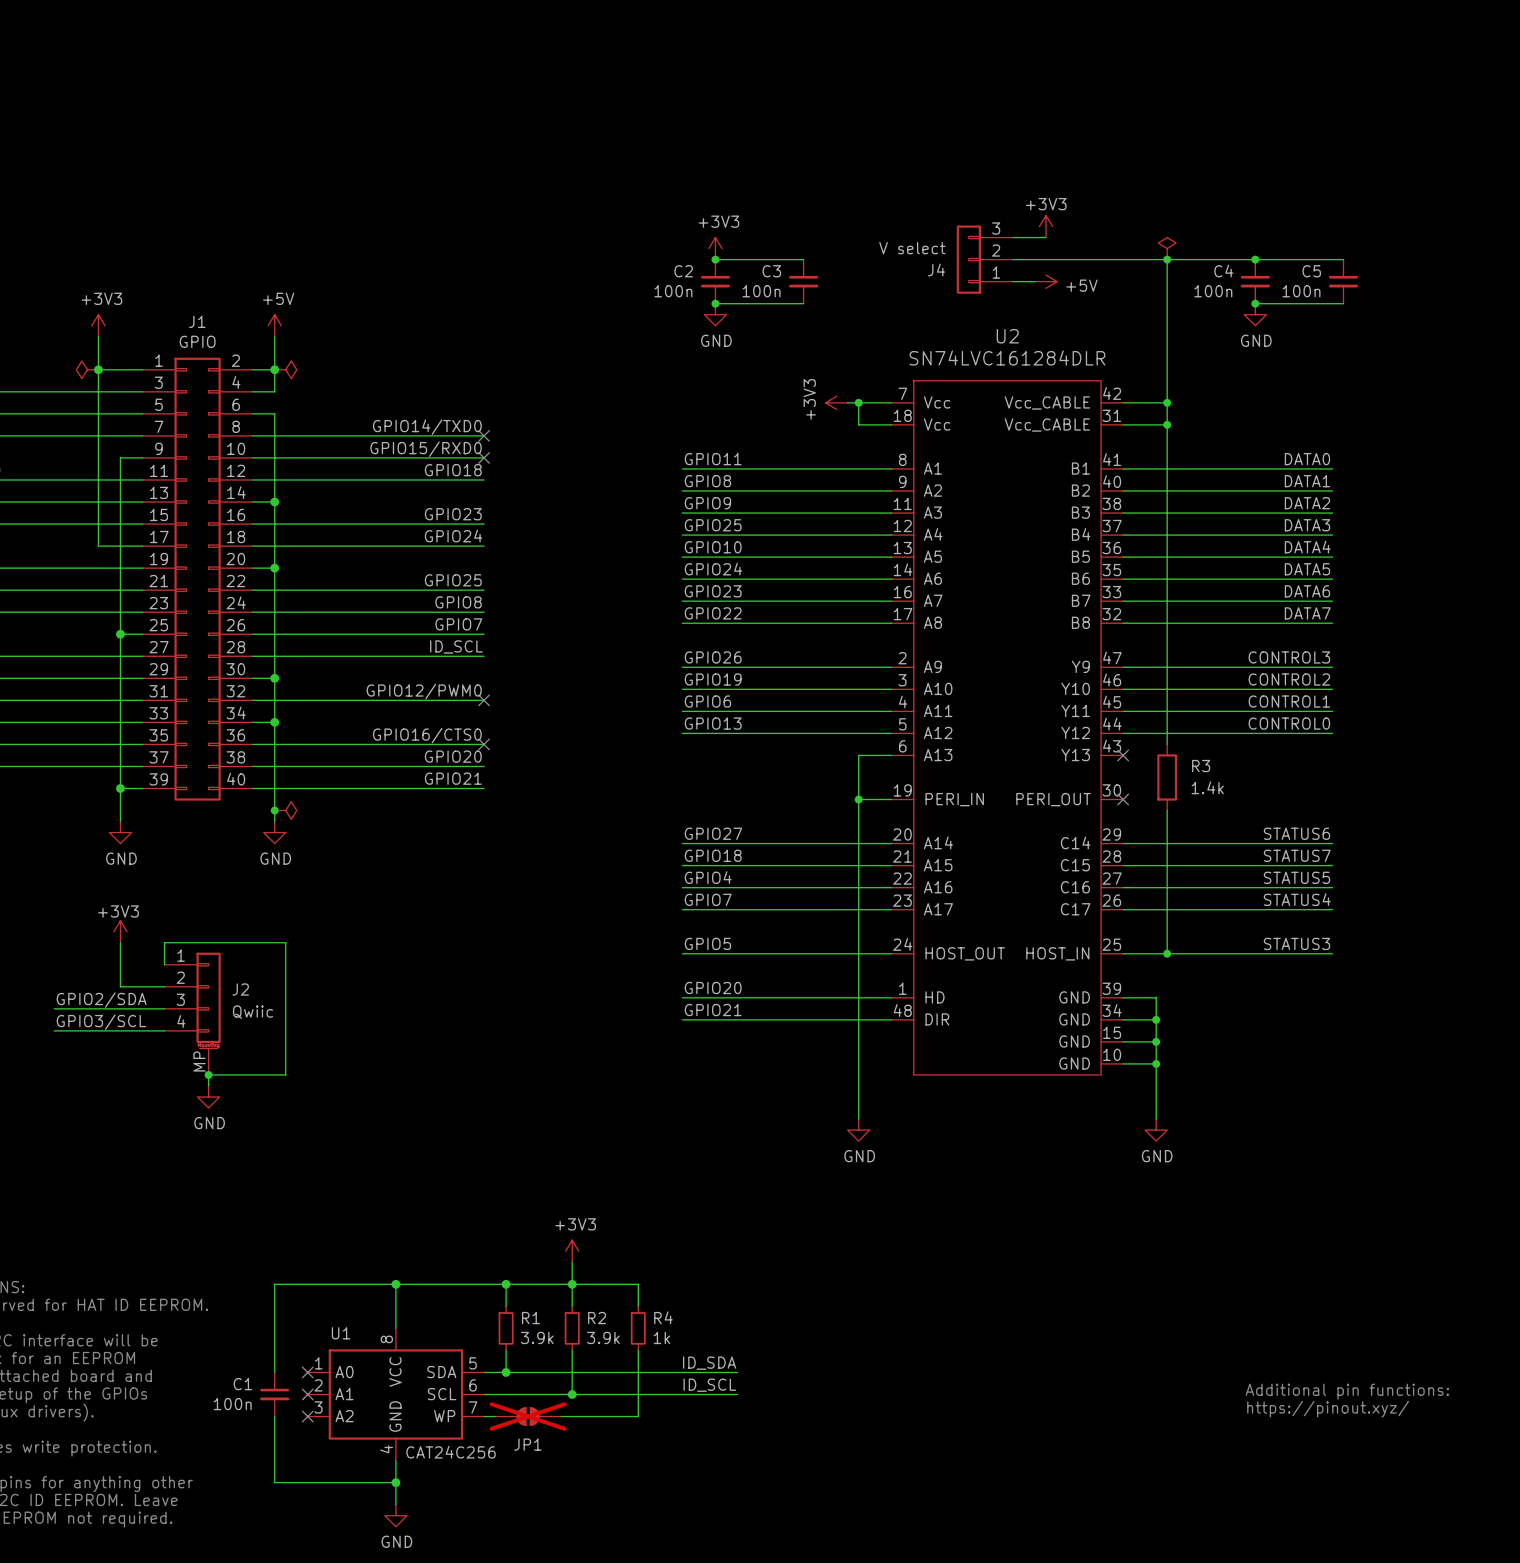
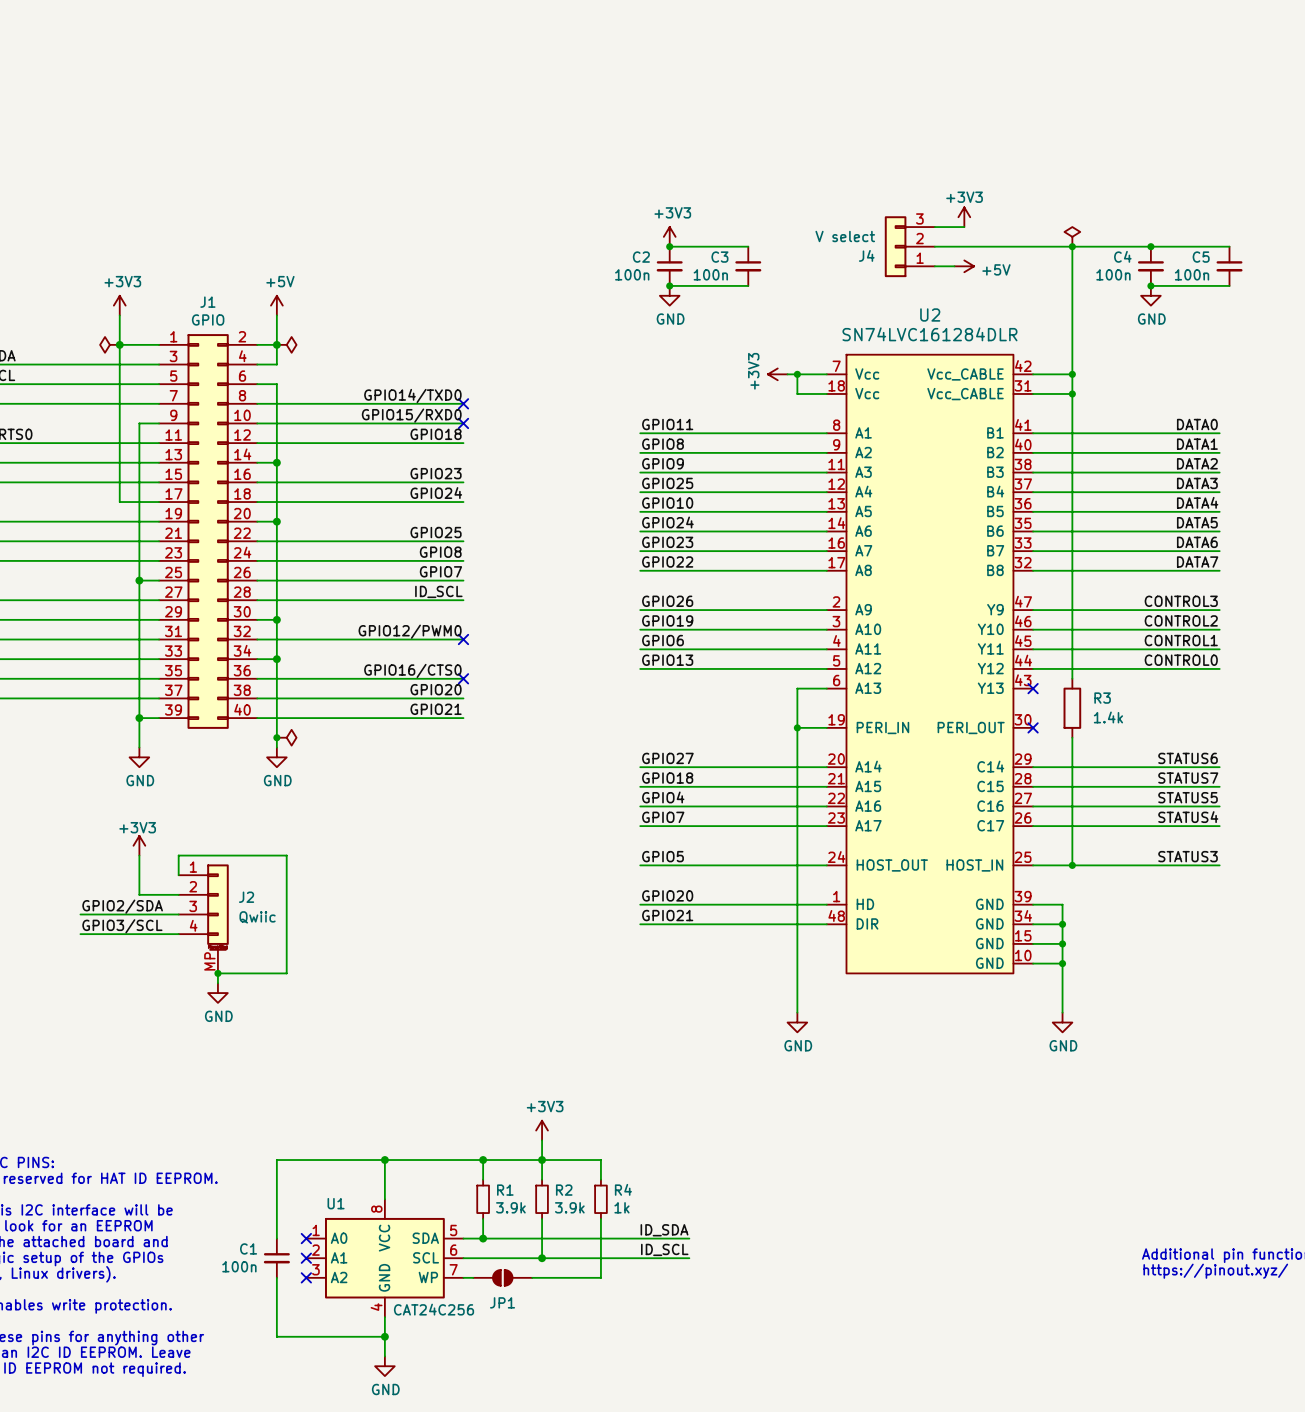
JP1 do-not-place cross: (528, 1416) -> none

